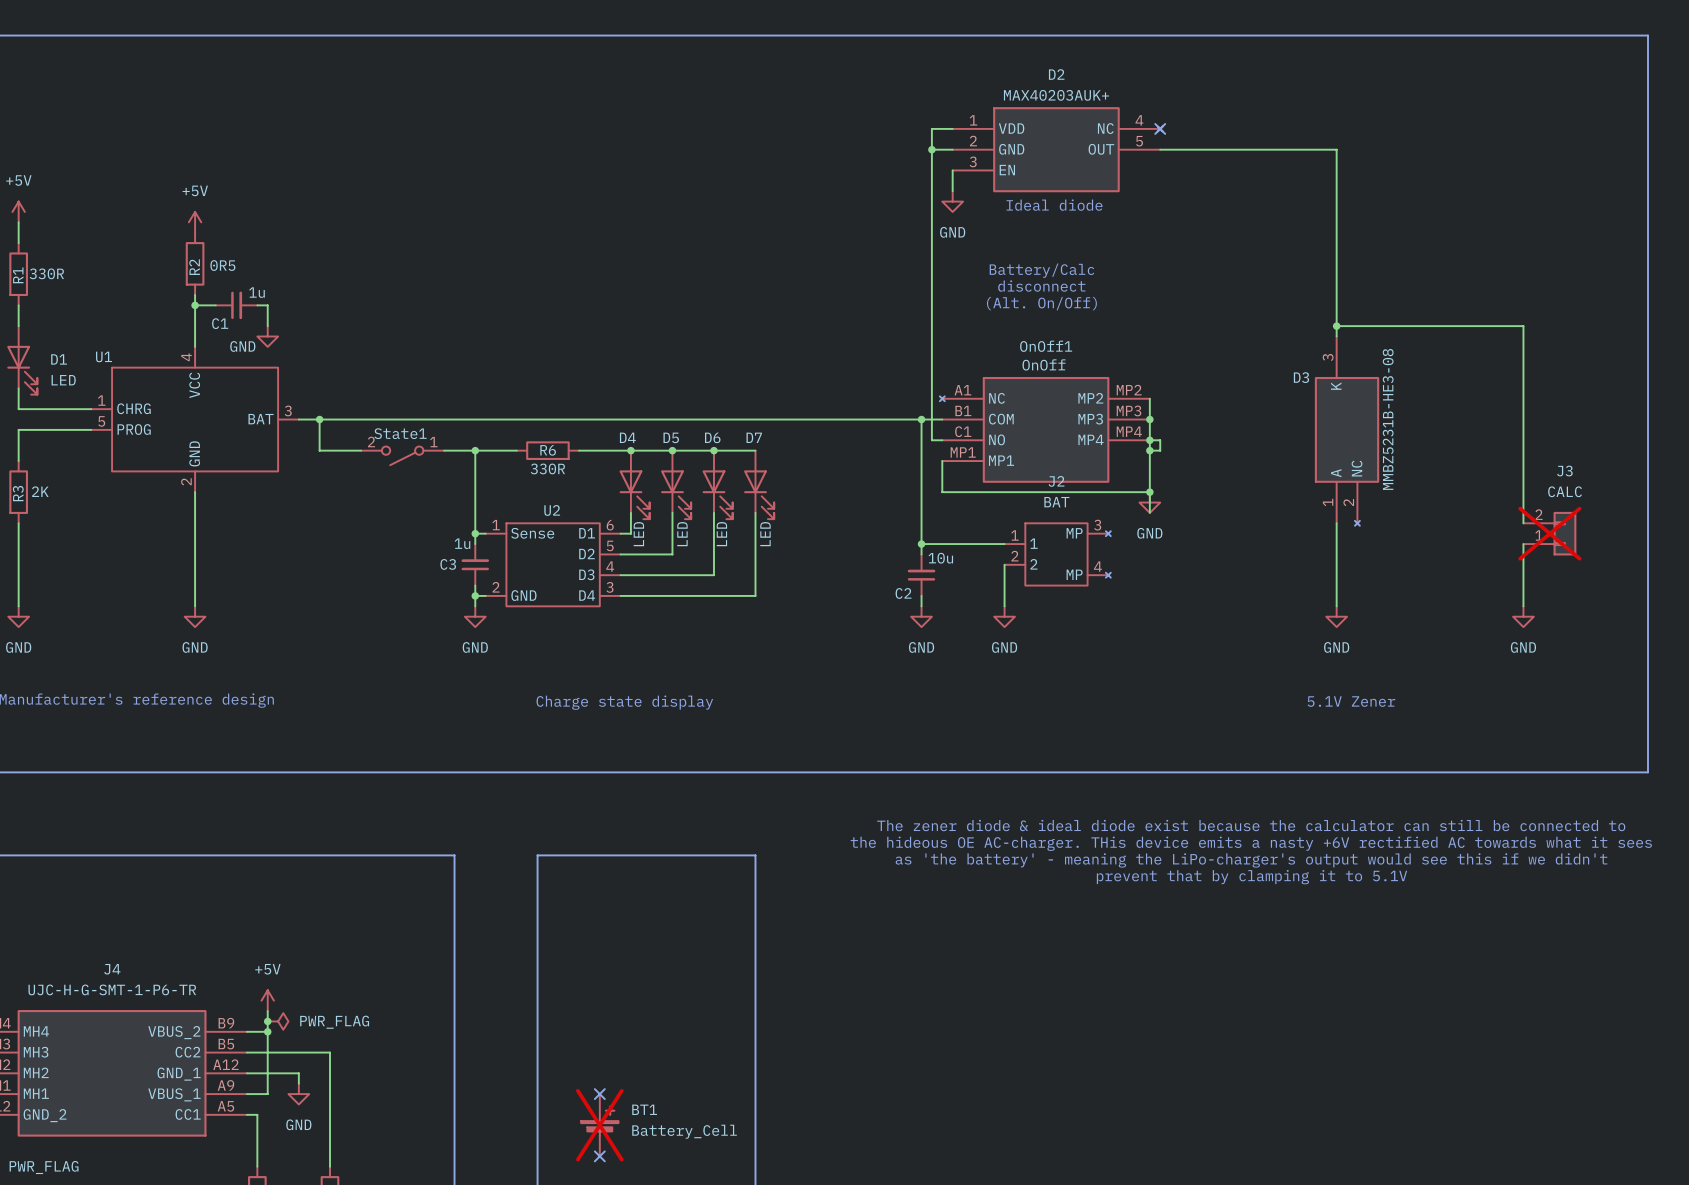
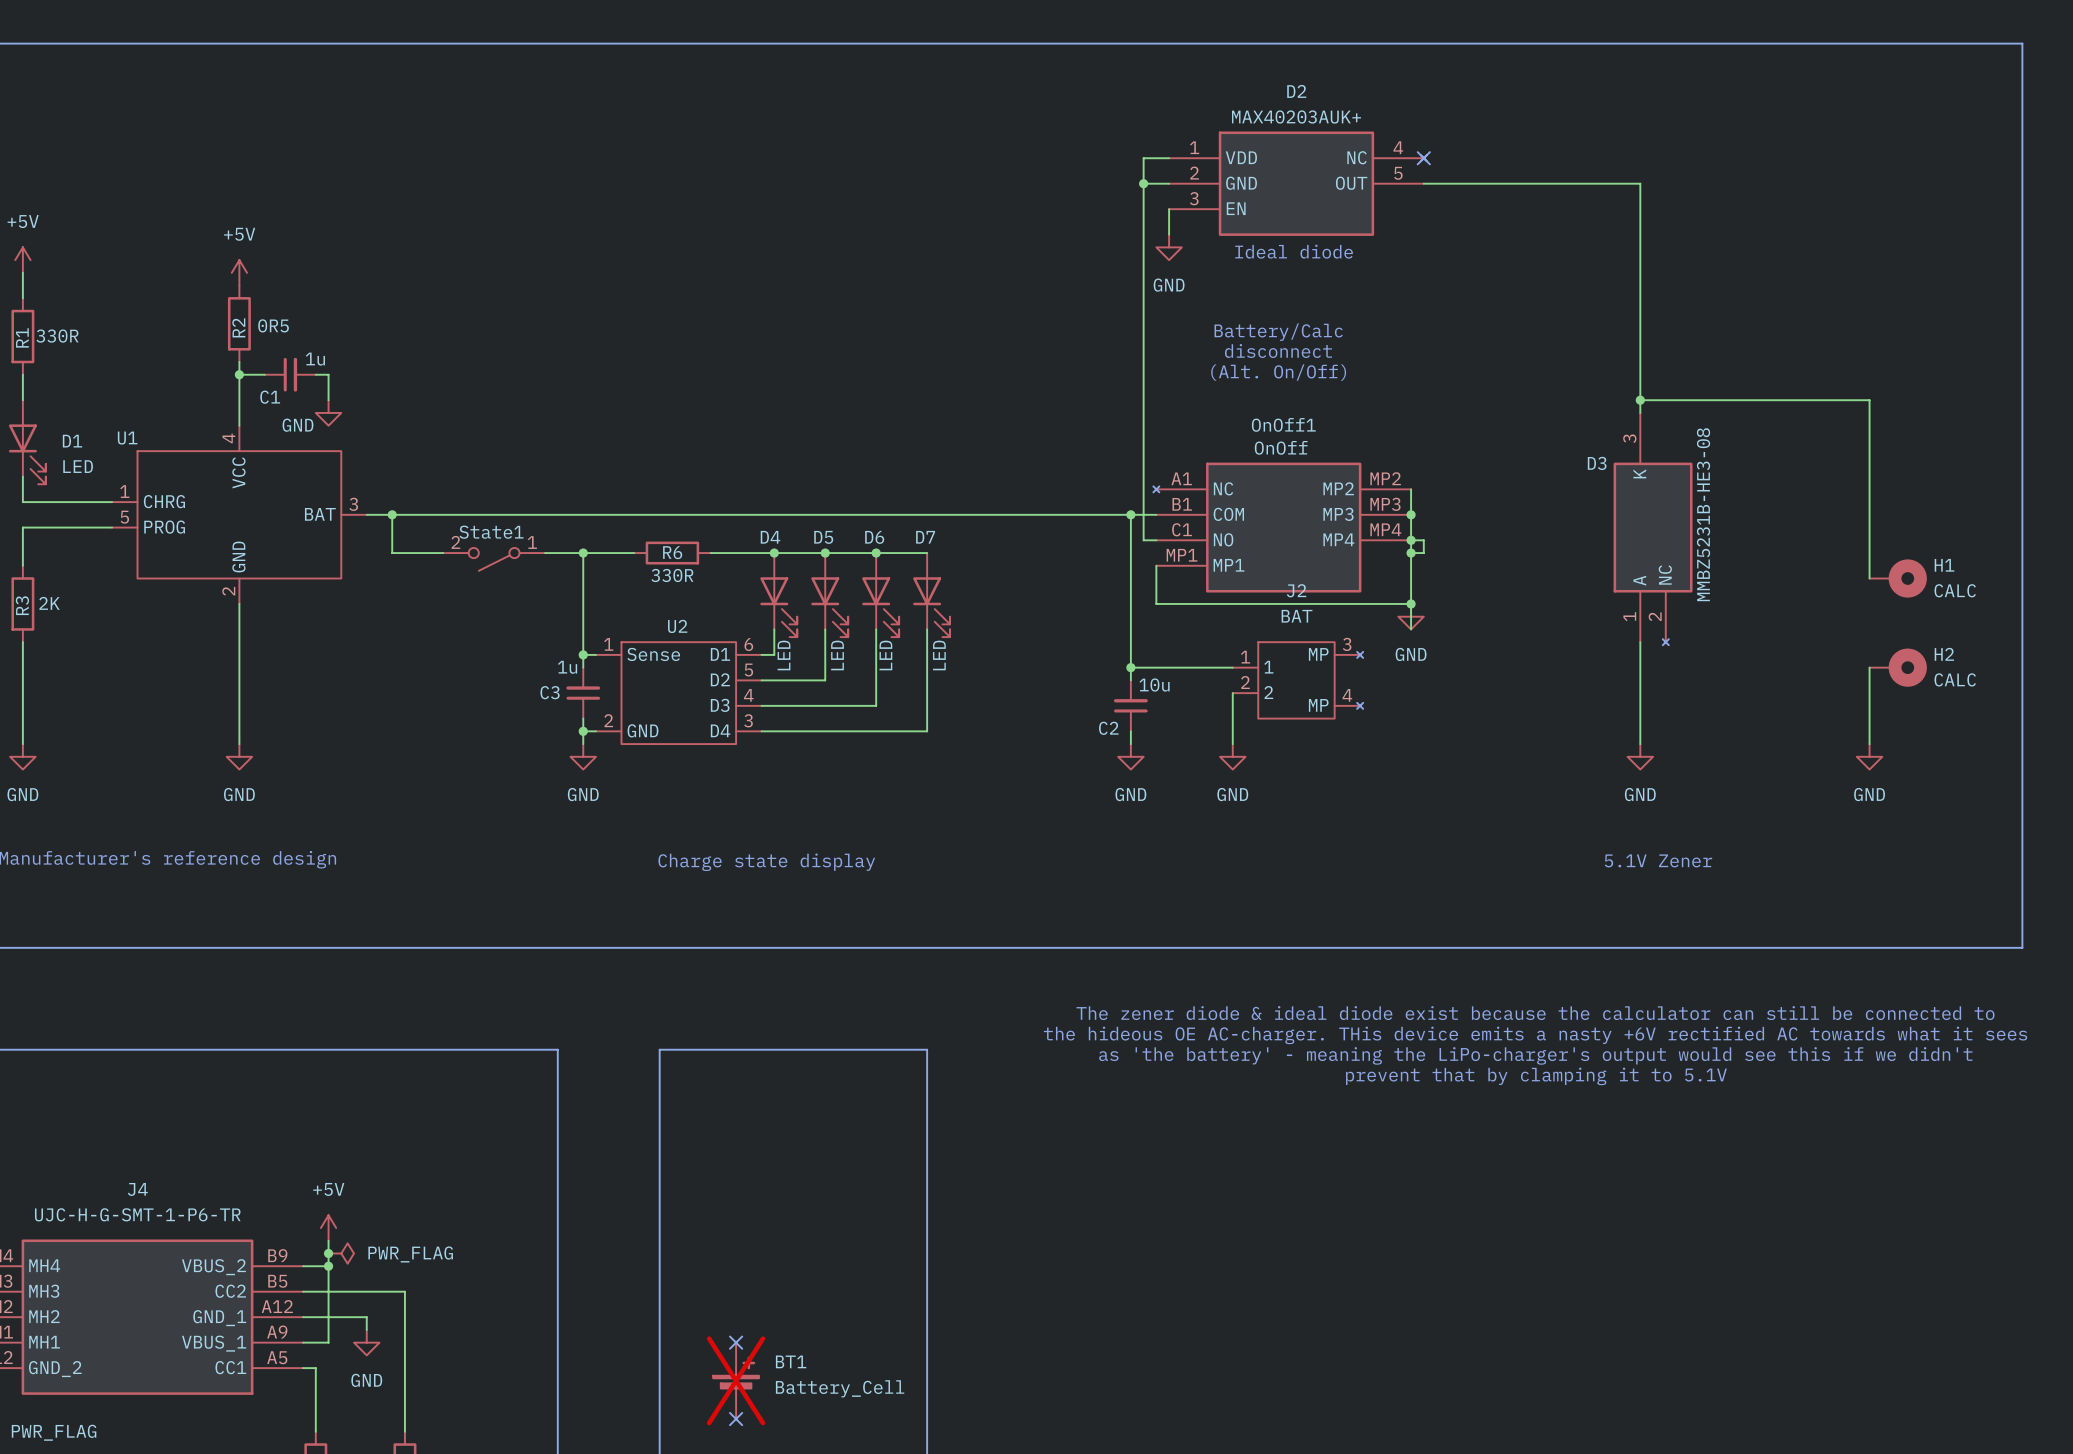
wire: (1523, 471) (1523, 523) -> none
H1: none -> CALC (1898, 578)
J3: CALC (1549, 533) -> none
H2: none -> CALC (1898, 667)

